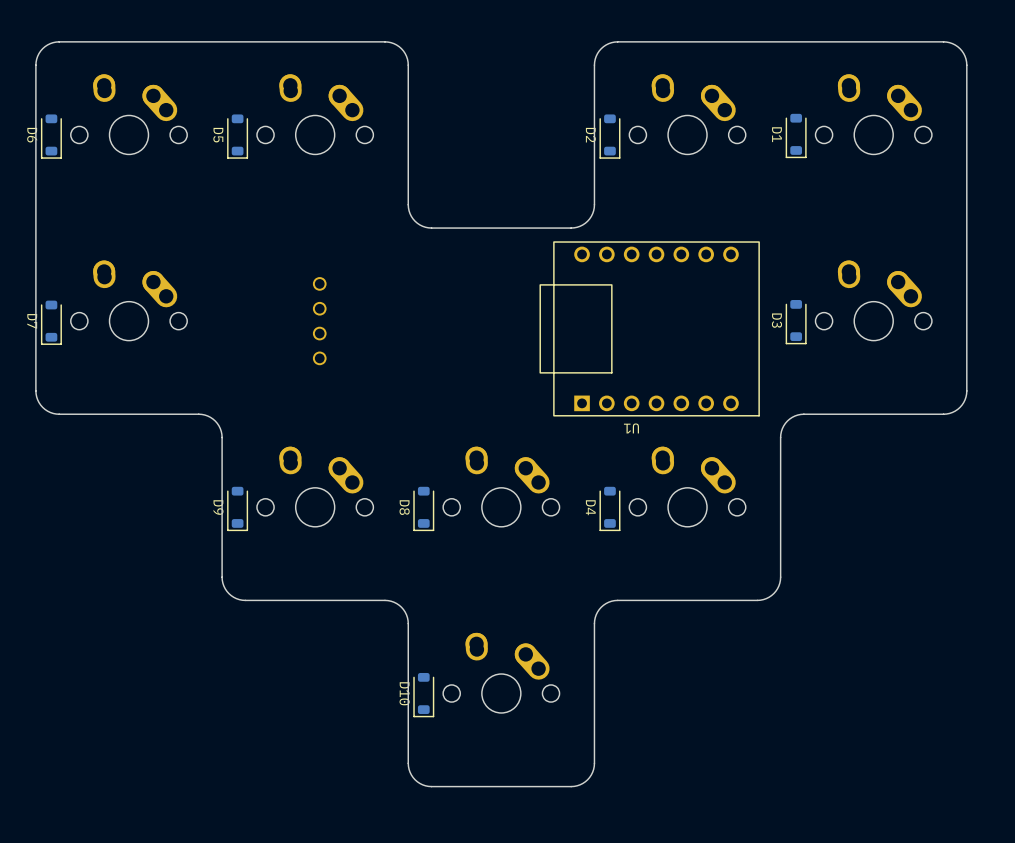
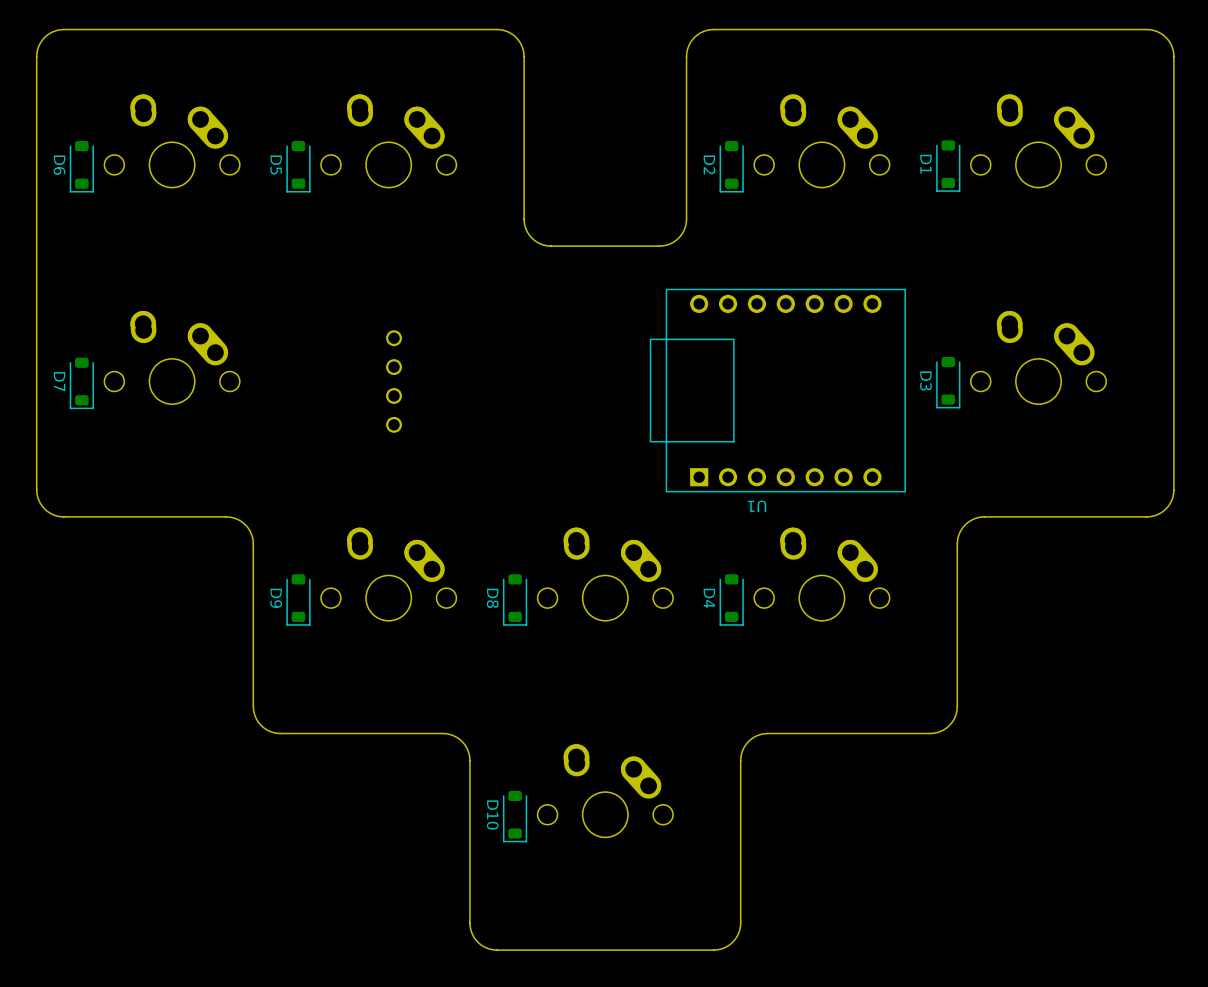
board edge: (943, 41) (617, 41) (606, 44) (599, 50) (594, 62) (594, 207) (591, 216) (585, 223) (571, 228) (431, 228) (422, 226) (415, 221) (410, 213) (408, 204) (408, 62) (403, 50) (393, 43) (385, 41) (59, 41) (50, 43) (39, 53) (35, 65) (35, 390) (37, 399) (45, 409) (56, 414) (198, 414) (207, 416) (215, 421) (220, 428) (222, 437) (222, 580) (226, 591) (233, 597) (245, 600) (385, 600) (393, 602) (401, 607) (406, 614) (408, 623) (408, 766) (411, 774) (417, 781) (431, 786) (571, 786) (580, 784) (589, 777) (594, 766) (594, 623) (596, 614) (601, 607) (608, 602) (617, 600) (757, 600) (768, 597) (775, 591) (780, 580) (780, 437) (782, 428) (787, 421) (795, 416) (803, 414) (946, 414) (957, 409) (965, 399) (966, 390) (966, 65) (965, 56) (959, 48) (952, 43) (943, 41) -> (1146, 29) (1157, 31) (1165, 37) (1171, 46) (1173, 56) (1173, 489) (1171, 500) (1163, 511) (1150, 516) (984, 516) (974, 518) (965, 524) (959, 533) (957, 543) (957, 706) (953, 719) (946, 727) (933, 733) (767, 733) (757, 735) (748, 741) (742, 750) (740, 760) (740, 926) (735, 939) (723, 948) (713, 950) (497, 950) (483, 946) (475, 939) (470, 926) (469, 760) (467, 750) (462, 741) (453, 735) (442, 733) (280, 733) (266, 729) (258, 722) (253, 709) (253, 543) (251, 533) (245, 524) (236, 518) (226, 516) (60, 516) (47, 511) (38, 500) (36, 489) (36, 56) (40, 43) (53, 31) (63, 29) (497, 29) (507, 31) (518, 40) (523, 53) (524, 219) (529, 235) (537, 242) (547, 245) (659, 246) (675, 240) (685, 226) (686, 53) (692, 40) (703, 31) (713, 29) (1146, 29)

